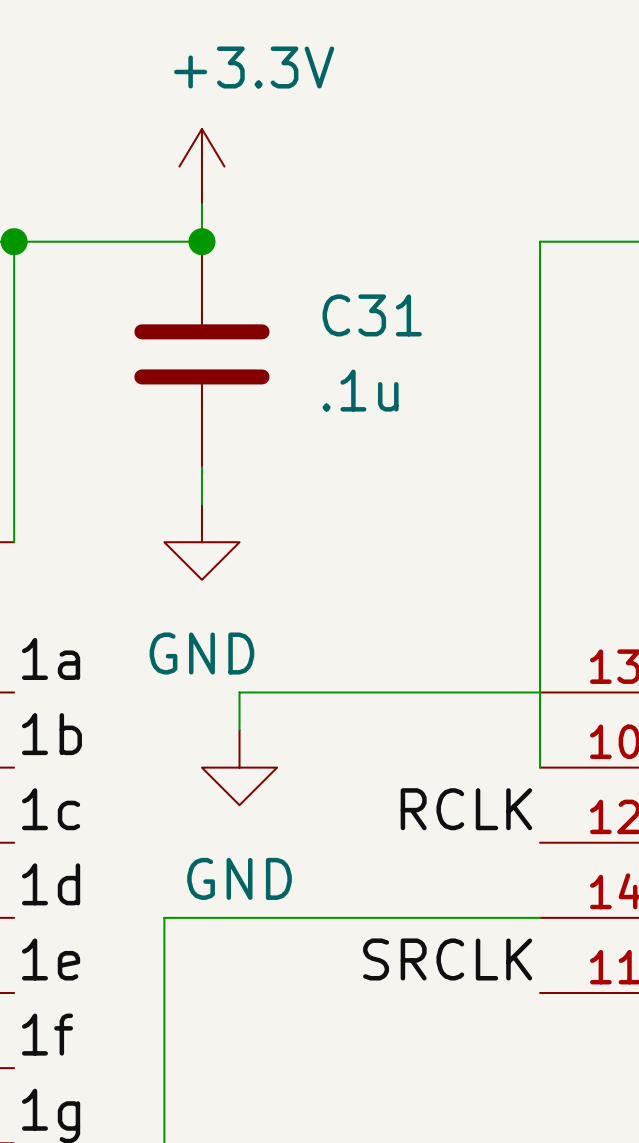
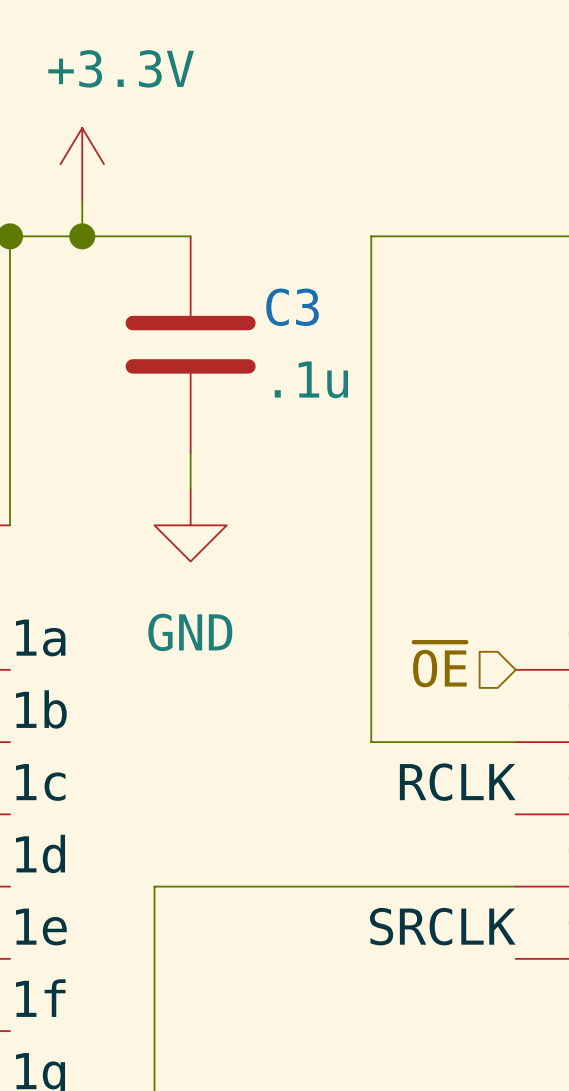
power symbol position: +3.3V (201, 166) -> +3.3V (82, 164)
wire: (201, 204) (201, 241) -> (82, 200) (82, 236)
junction position: (201, 241) -> (82, 236)
wire: (540, 241) (540, 767) -> (515, 236) (371, 236) (371, 742) (515, 742)
C31 name: C31 (372, 315) -> C3 (292, 307)
C31 value position: .1u (360, 390) -> .1u (311, 379)
hierarchical label: none -> ~{OE} (439, 664)
wire: (540, 692) (239, 692) (239, 730) -> none
power symbol: GND (239, 767) -> none

